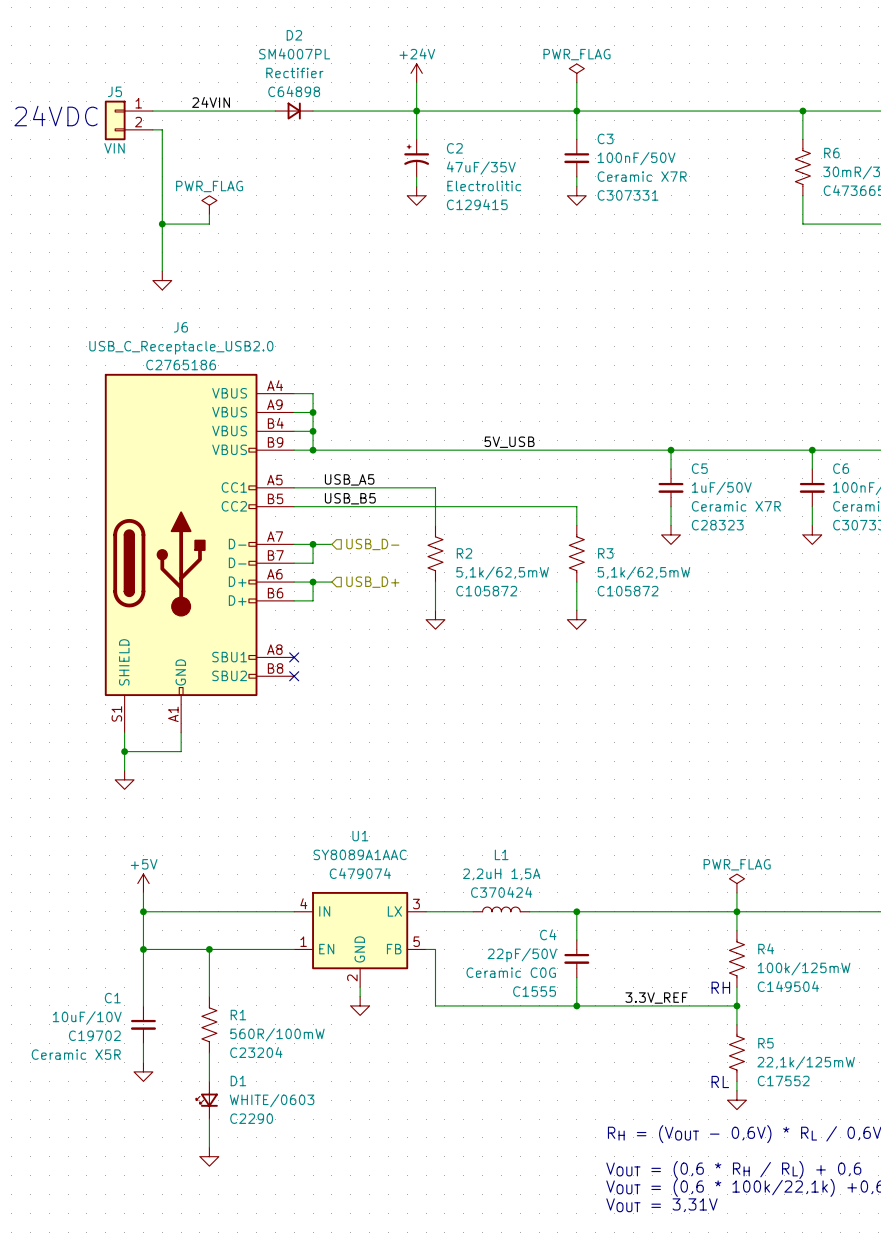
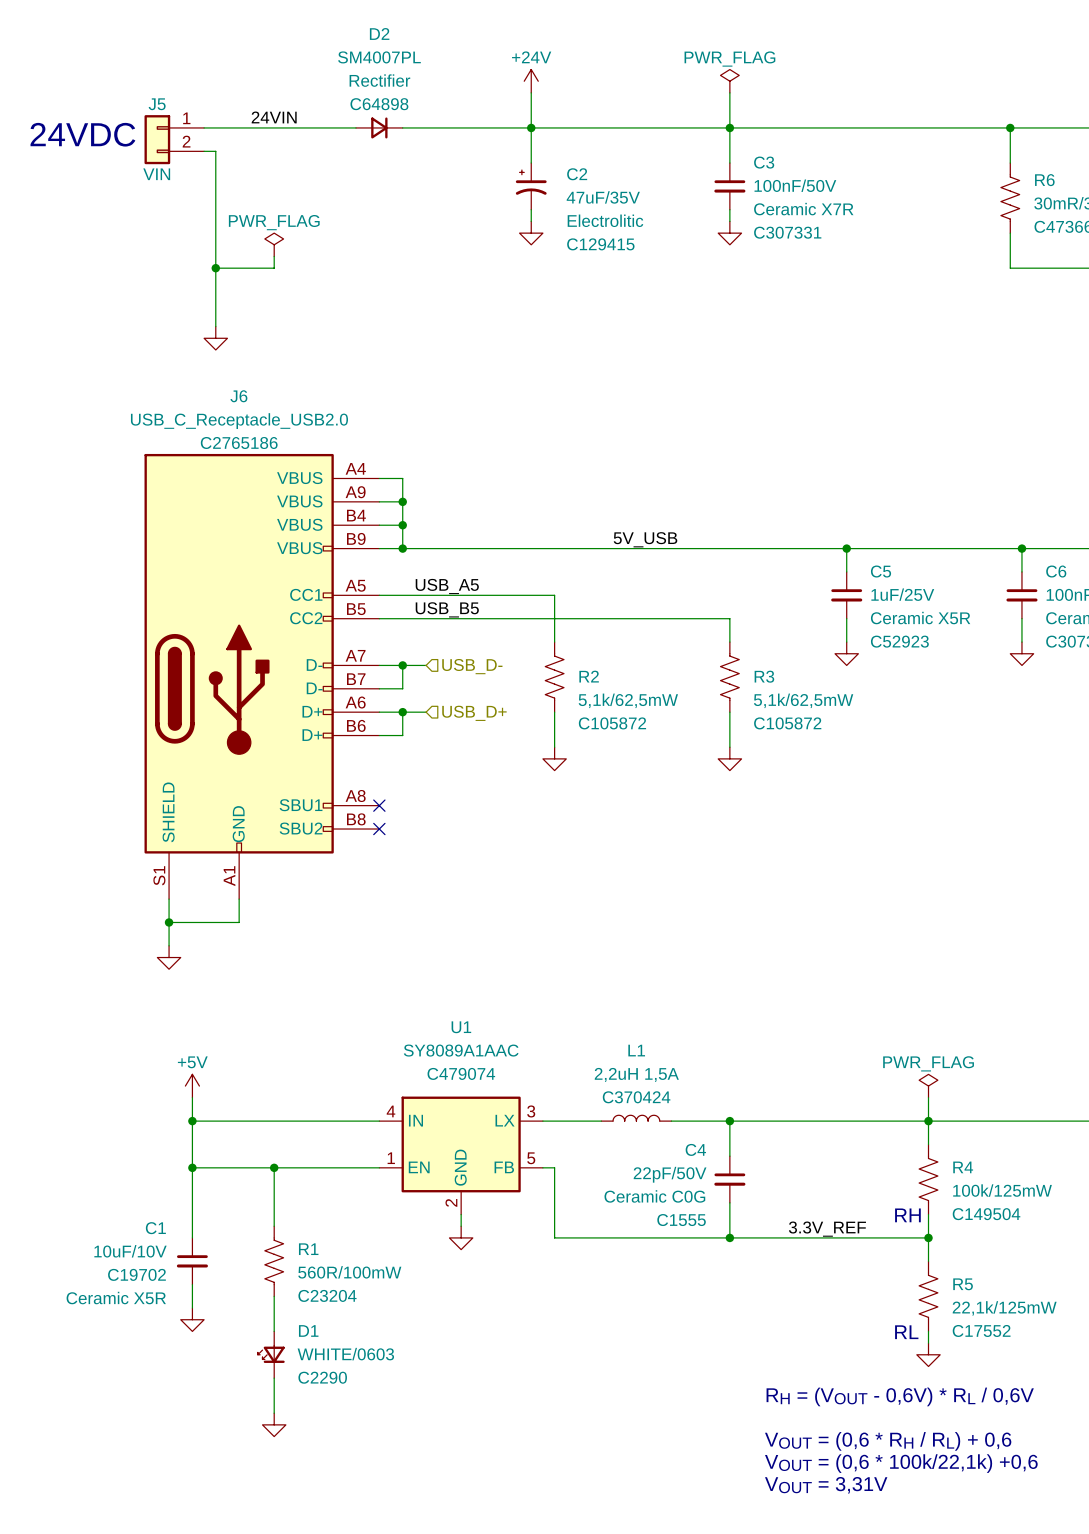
C5 value: 1uF/50V (721, 488) -> 1uF/25V (902, 594)
C5 text: Ceramic X7R (736, 506) -> Ceramic X5R (920, 618)
C5 text: C28323 (717, 525) -> C52923 (899, 641)

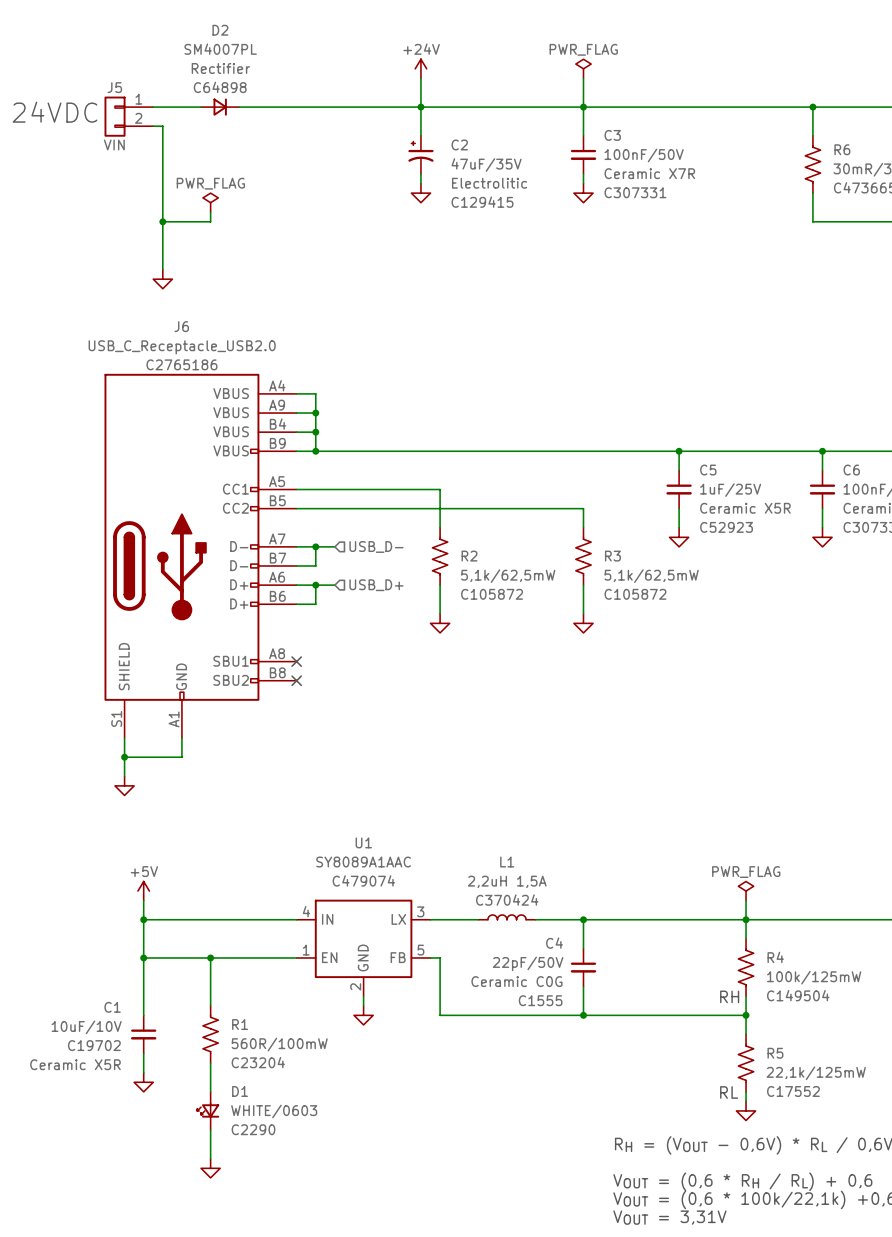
label: 24VIN (274, 117) -> none
D2 position: (379, 127) -> (220, 107)
label: 5V_USB (645, 539) -> none
label: USB_A5 (447, 586) -> none
label: USB_B5 (447, 609) -> none
label: 3.3V_REF (827, 1229) -> none

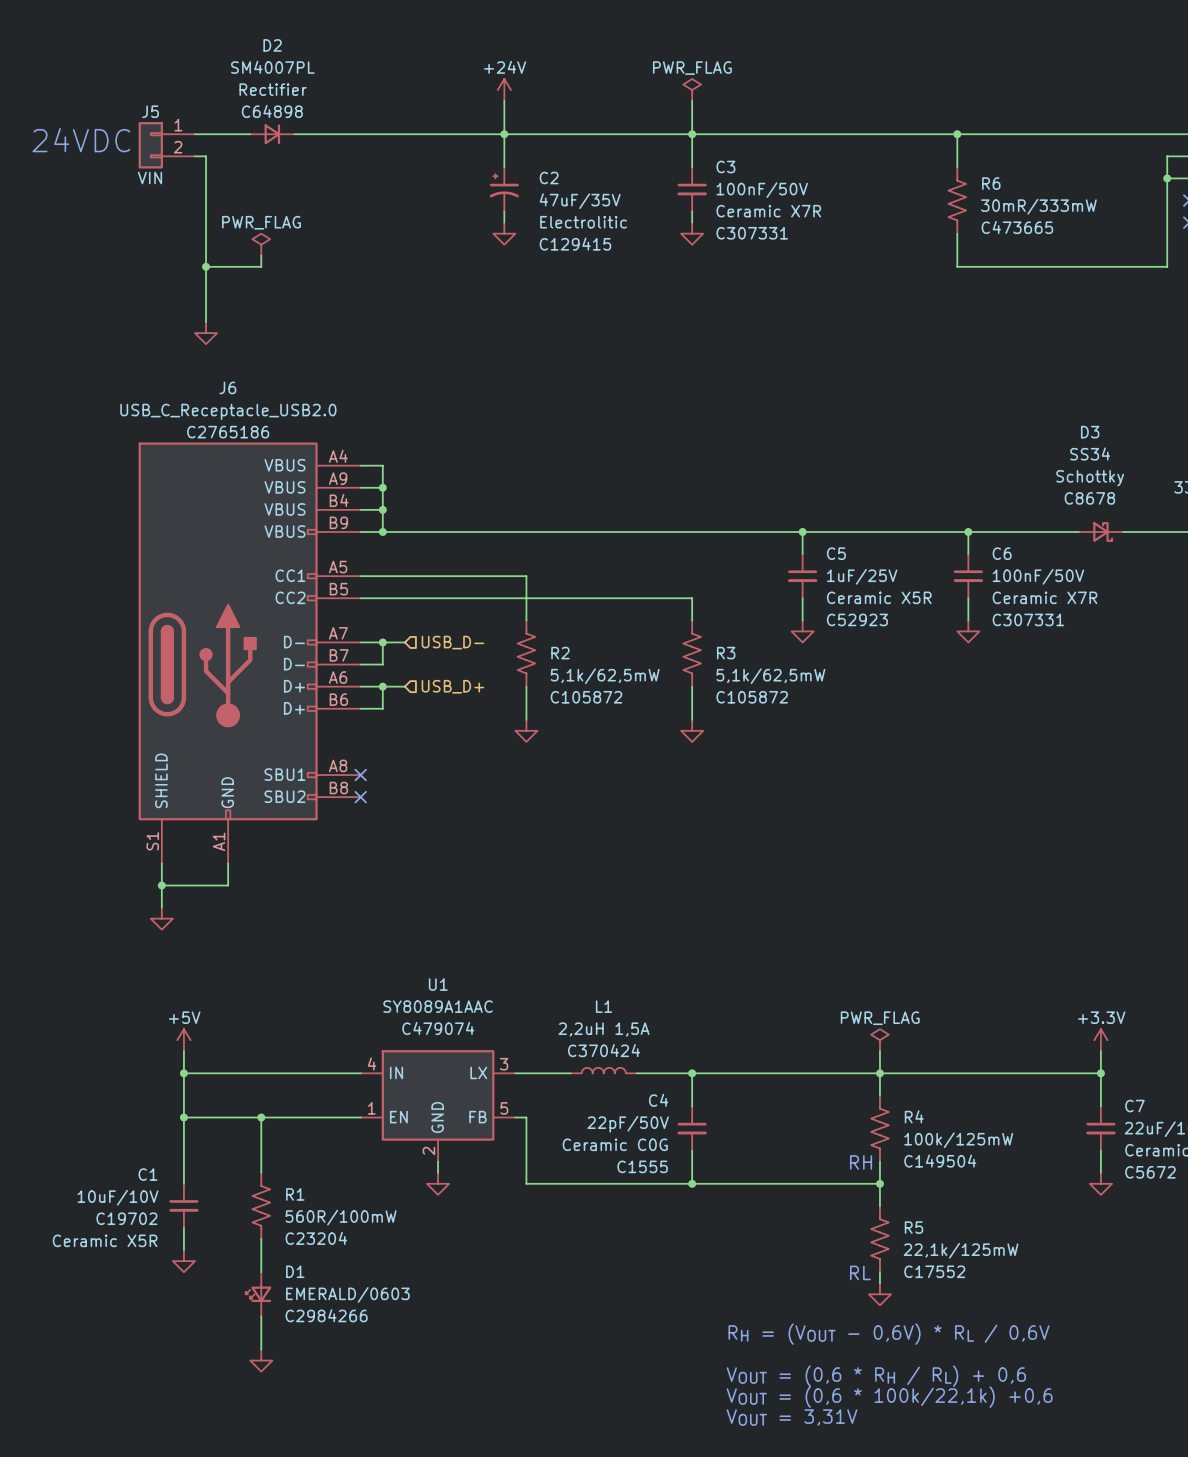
D1 value: WHITE/0603 (274, 1111) -> EMERALD/0603 (347, 1294)
D1 text: C2290 (253, 1129) -> C2984266 (326, 1315)

